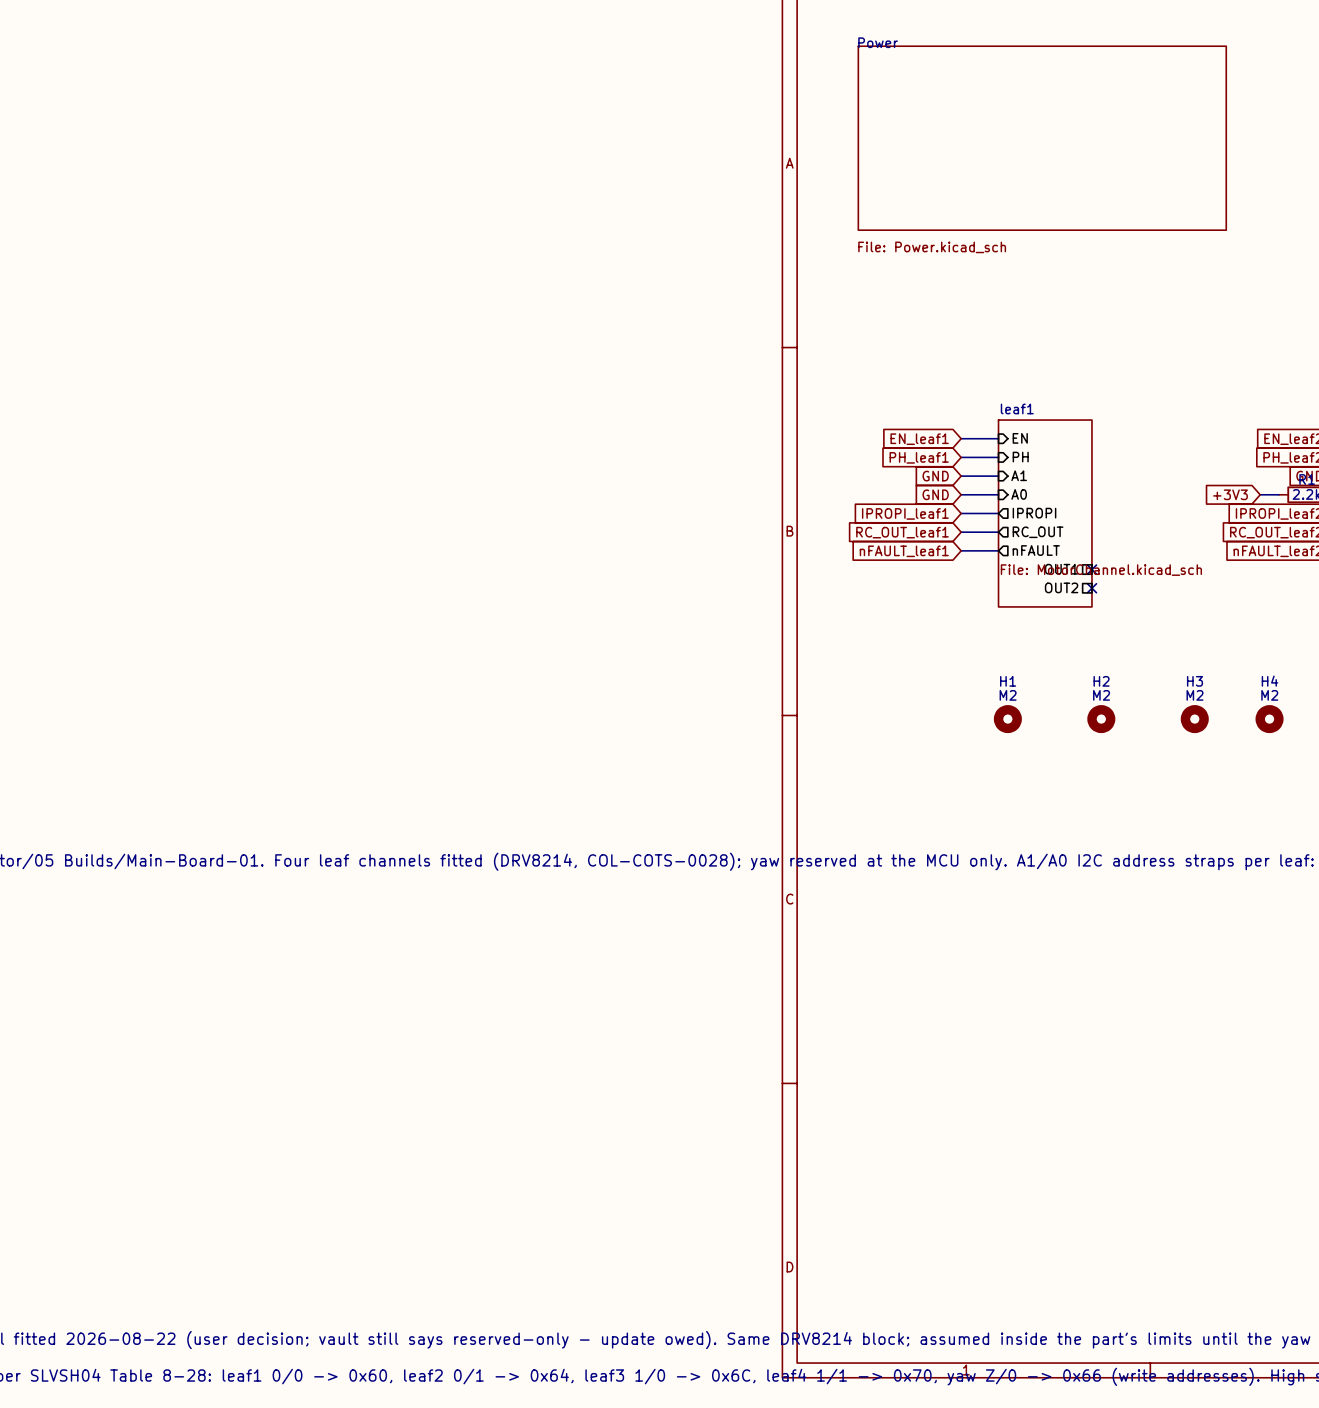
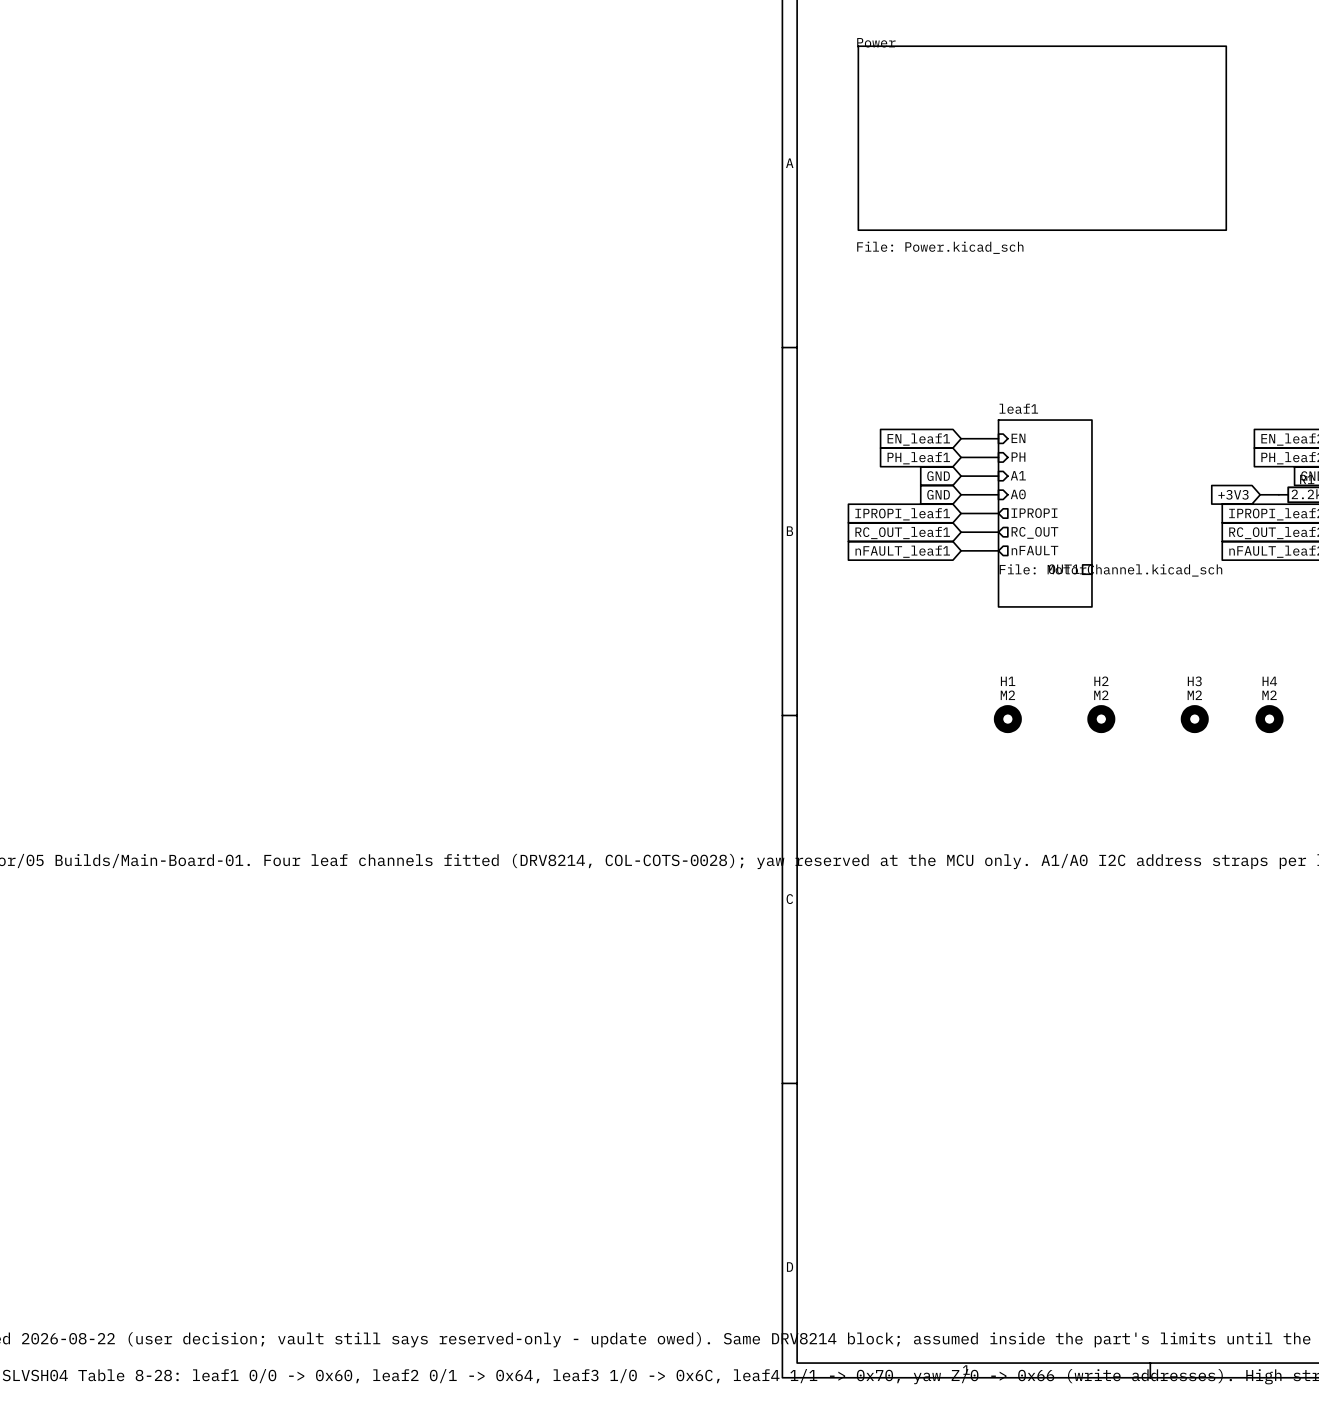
no-connect mark: (1091, 569) -> none
sheet pin: OUT2 (1061, 587) -> none
no-connect mark: (1091, 588) -> none

